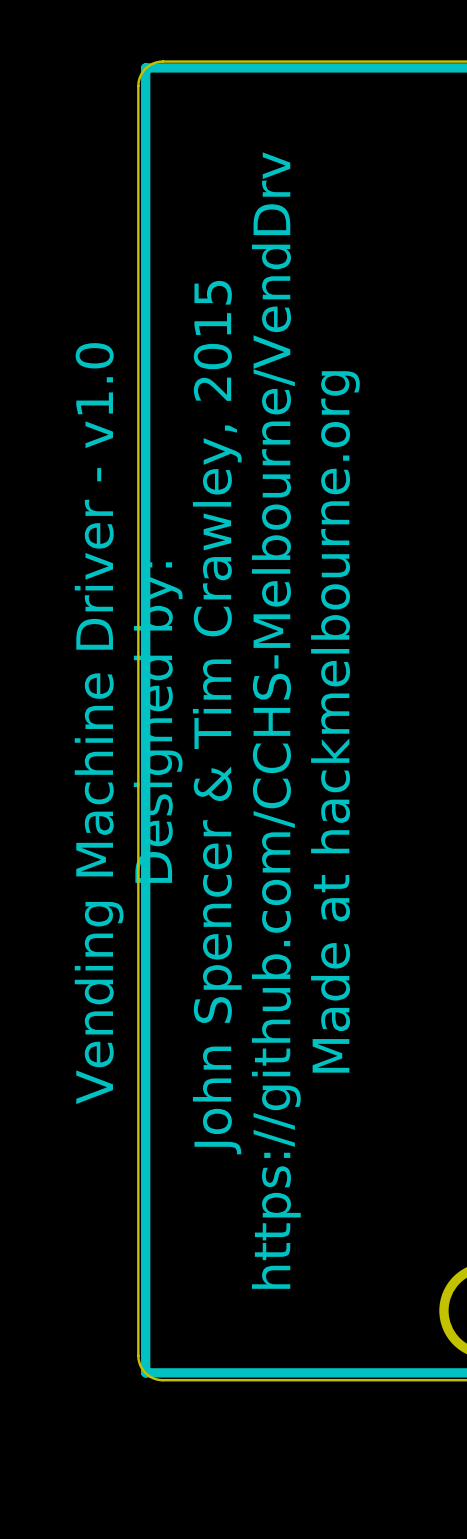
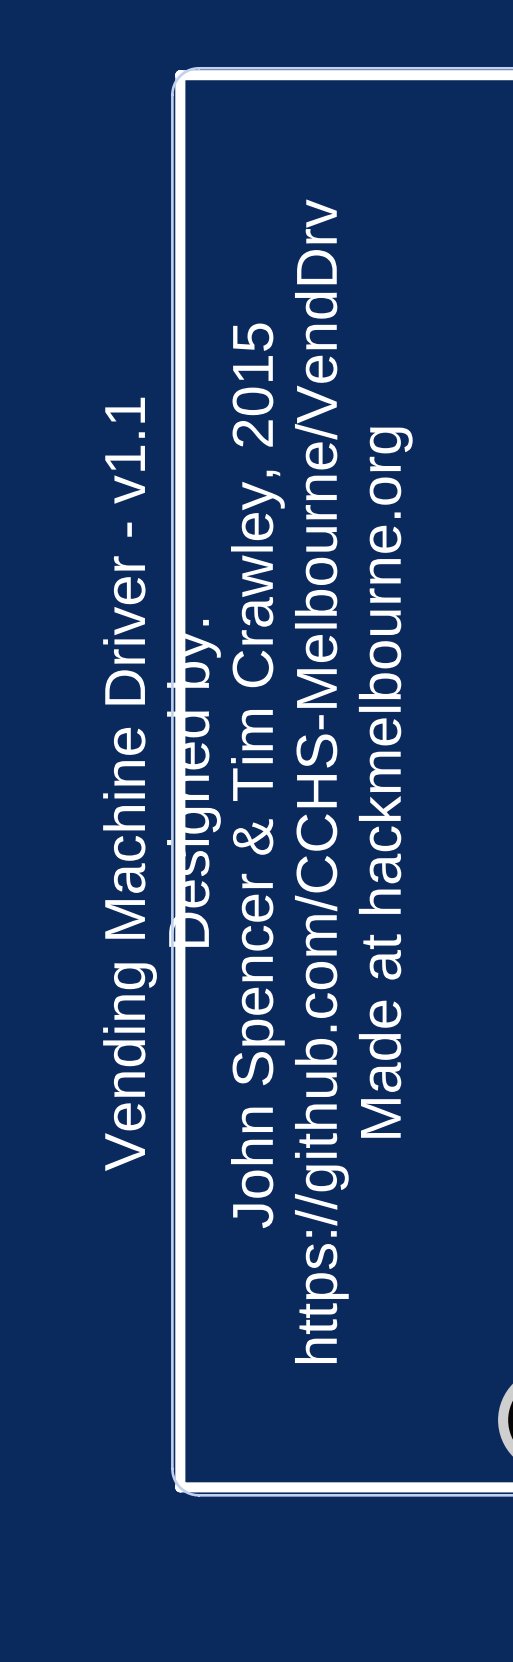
text: Vending Machine Driver - v1.0 (99, 723) -> Vending Machine Driver - v1.1 (130, 784)

